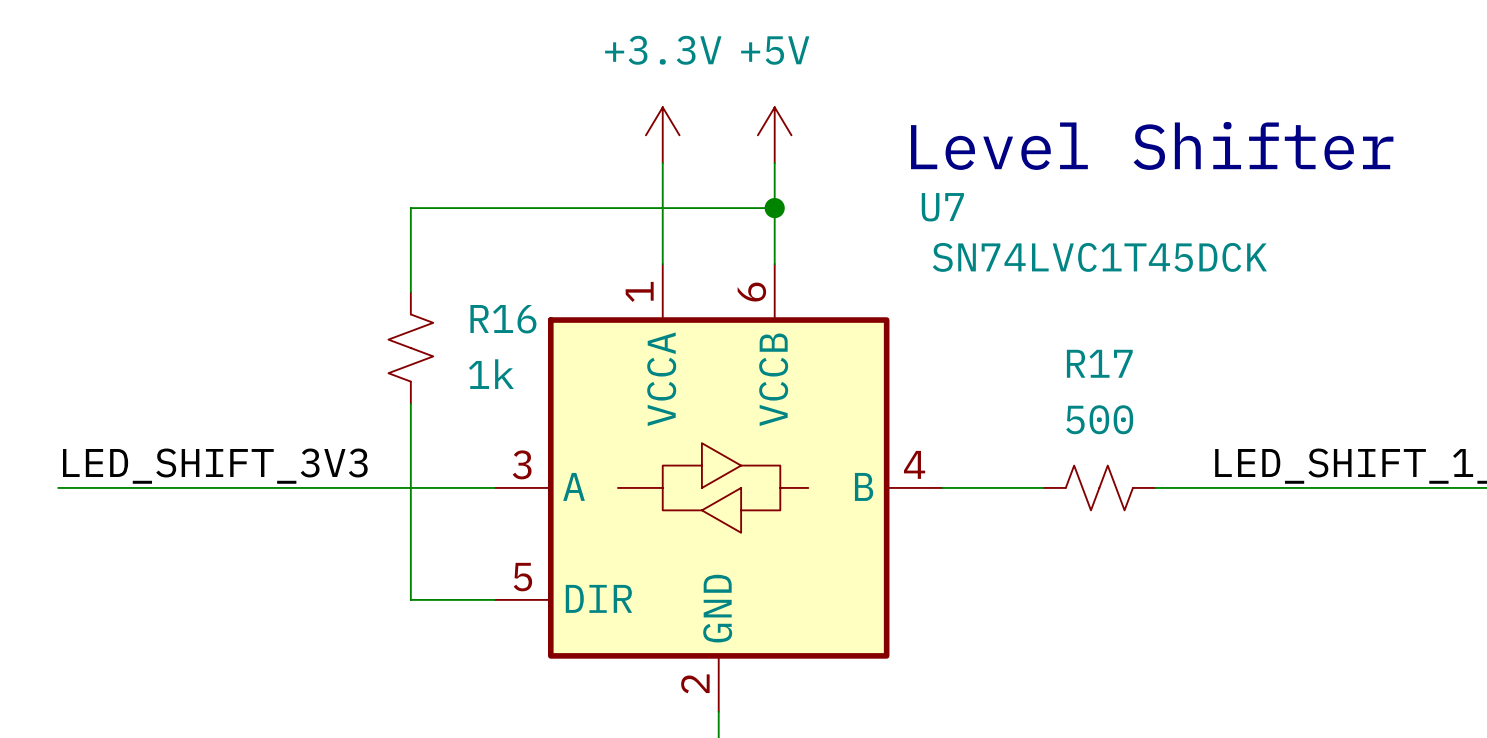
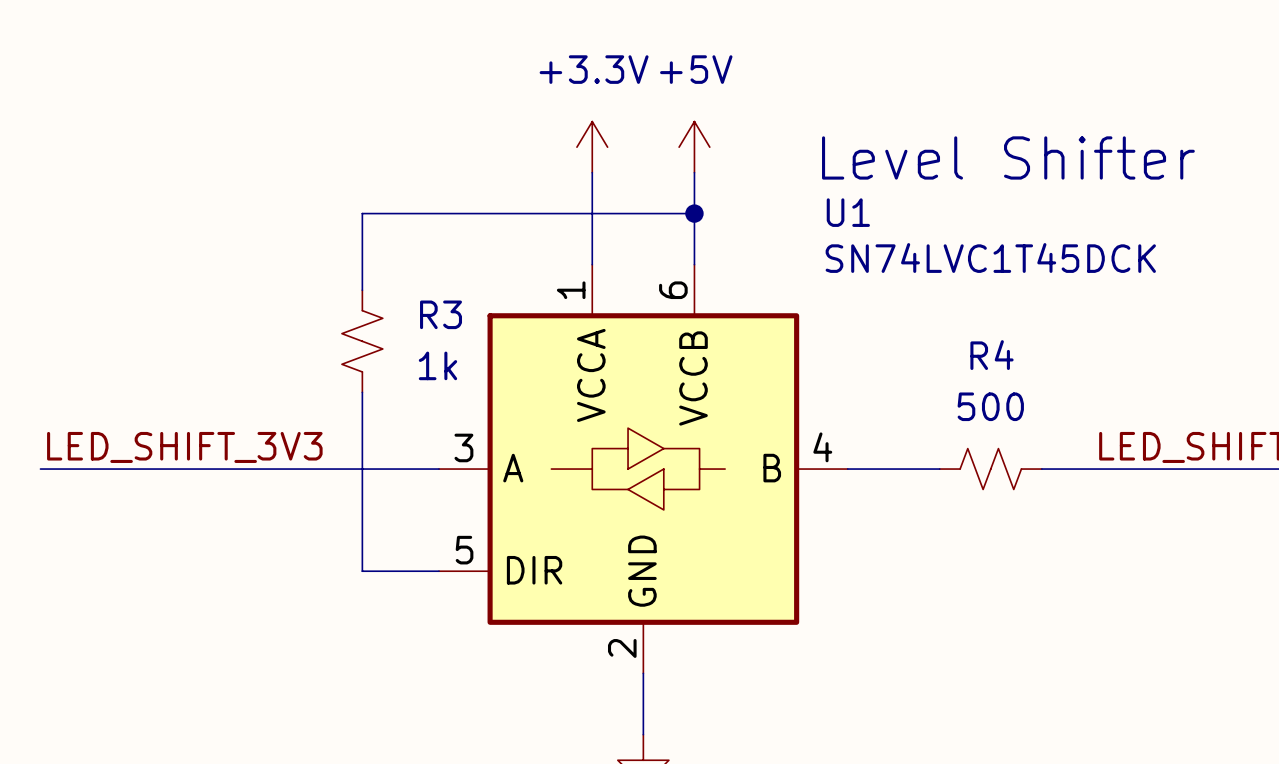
U7 name: U7 (942, 207) -> U1 (848, 212)
R16 name: R16 (503, 319) -> R3 (441, 314)
R17 name: R17 (1099, 363) -> R4 (991, 355)

